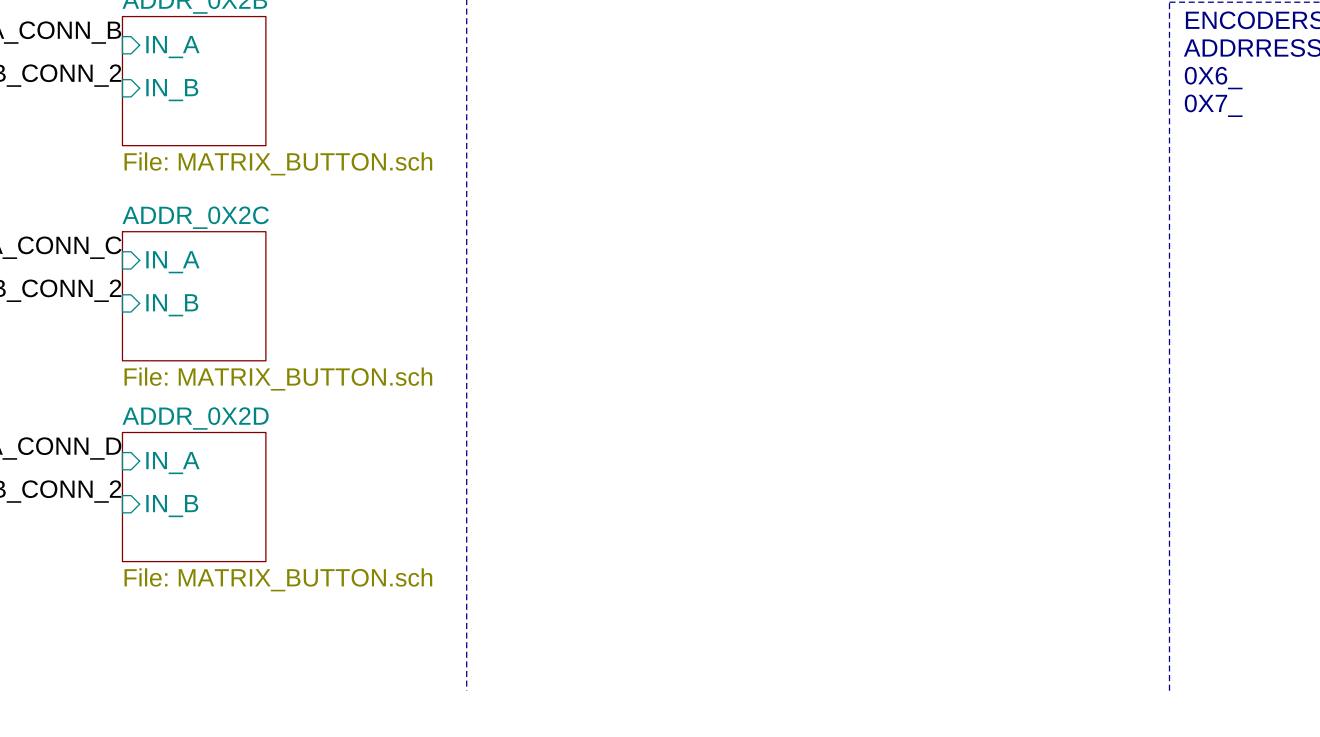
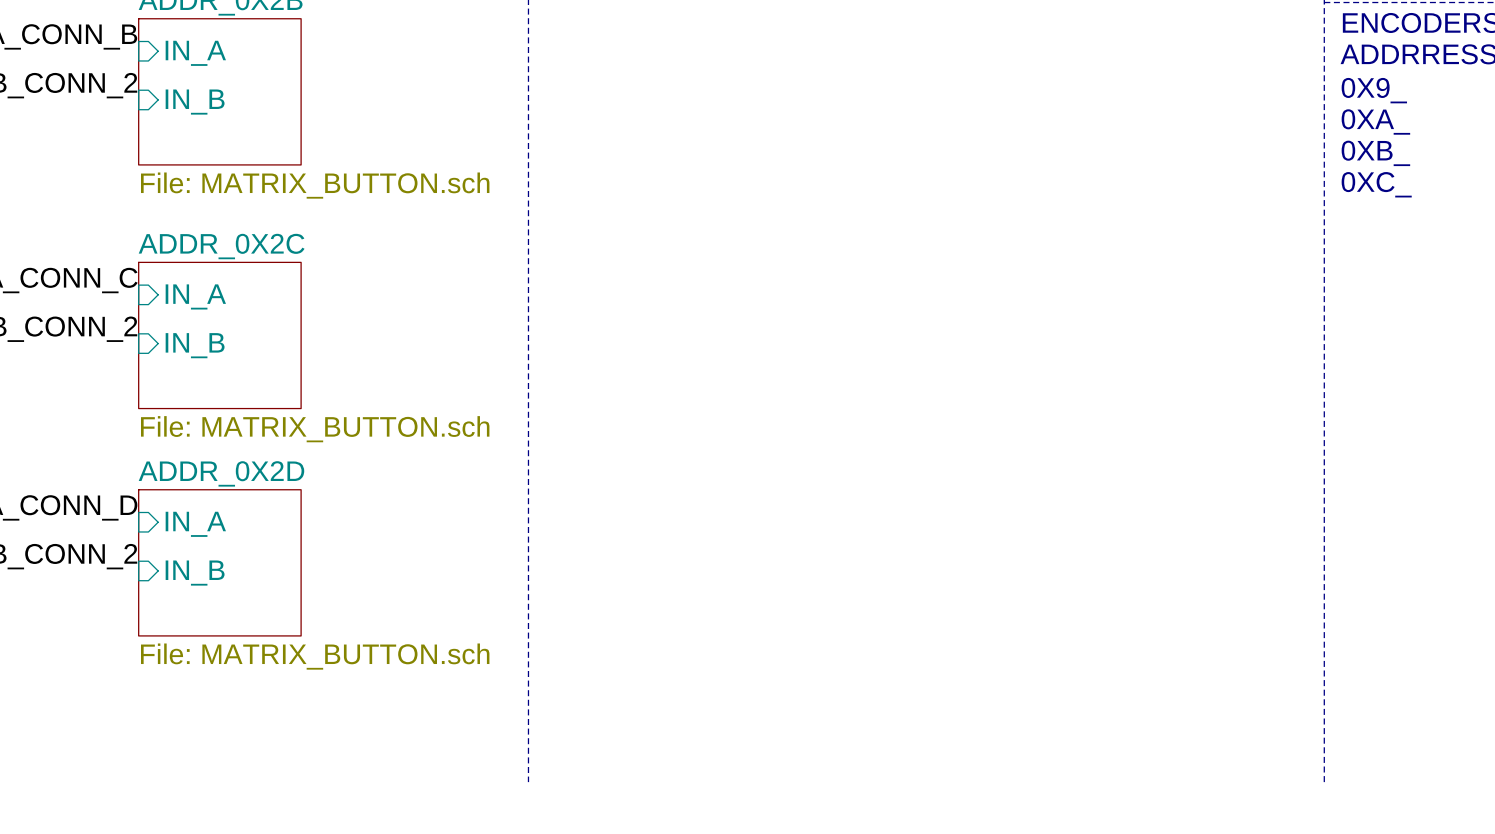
text: 0X6_ (1213, 78) -> 0X9_ (1374, 90)
text: 0X7_ (1213, 105) -> 0XA_ (1375, 122)
text: none -> 0XB_ (1375, 153)
text: none -> 0XC_ (1376, 184)

